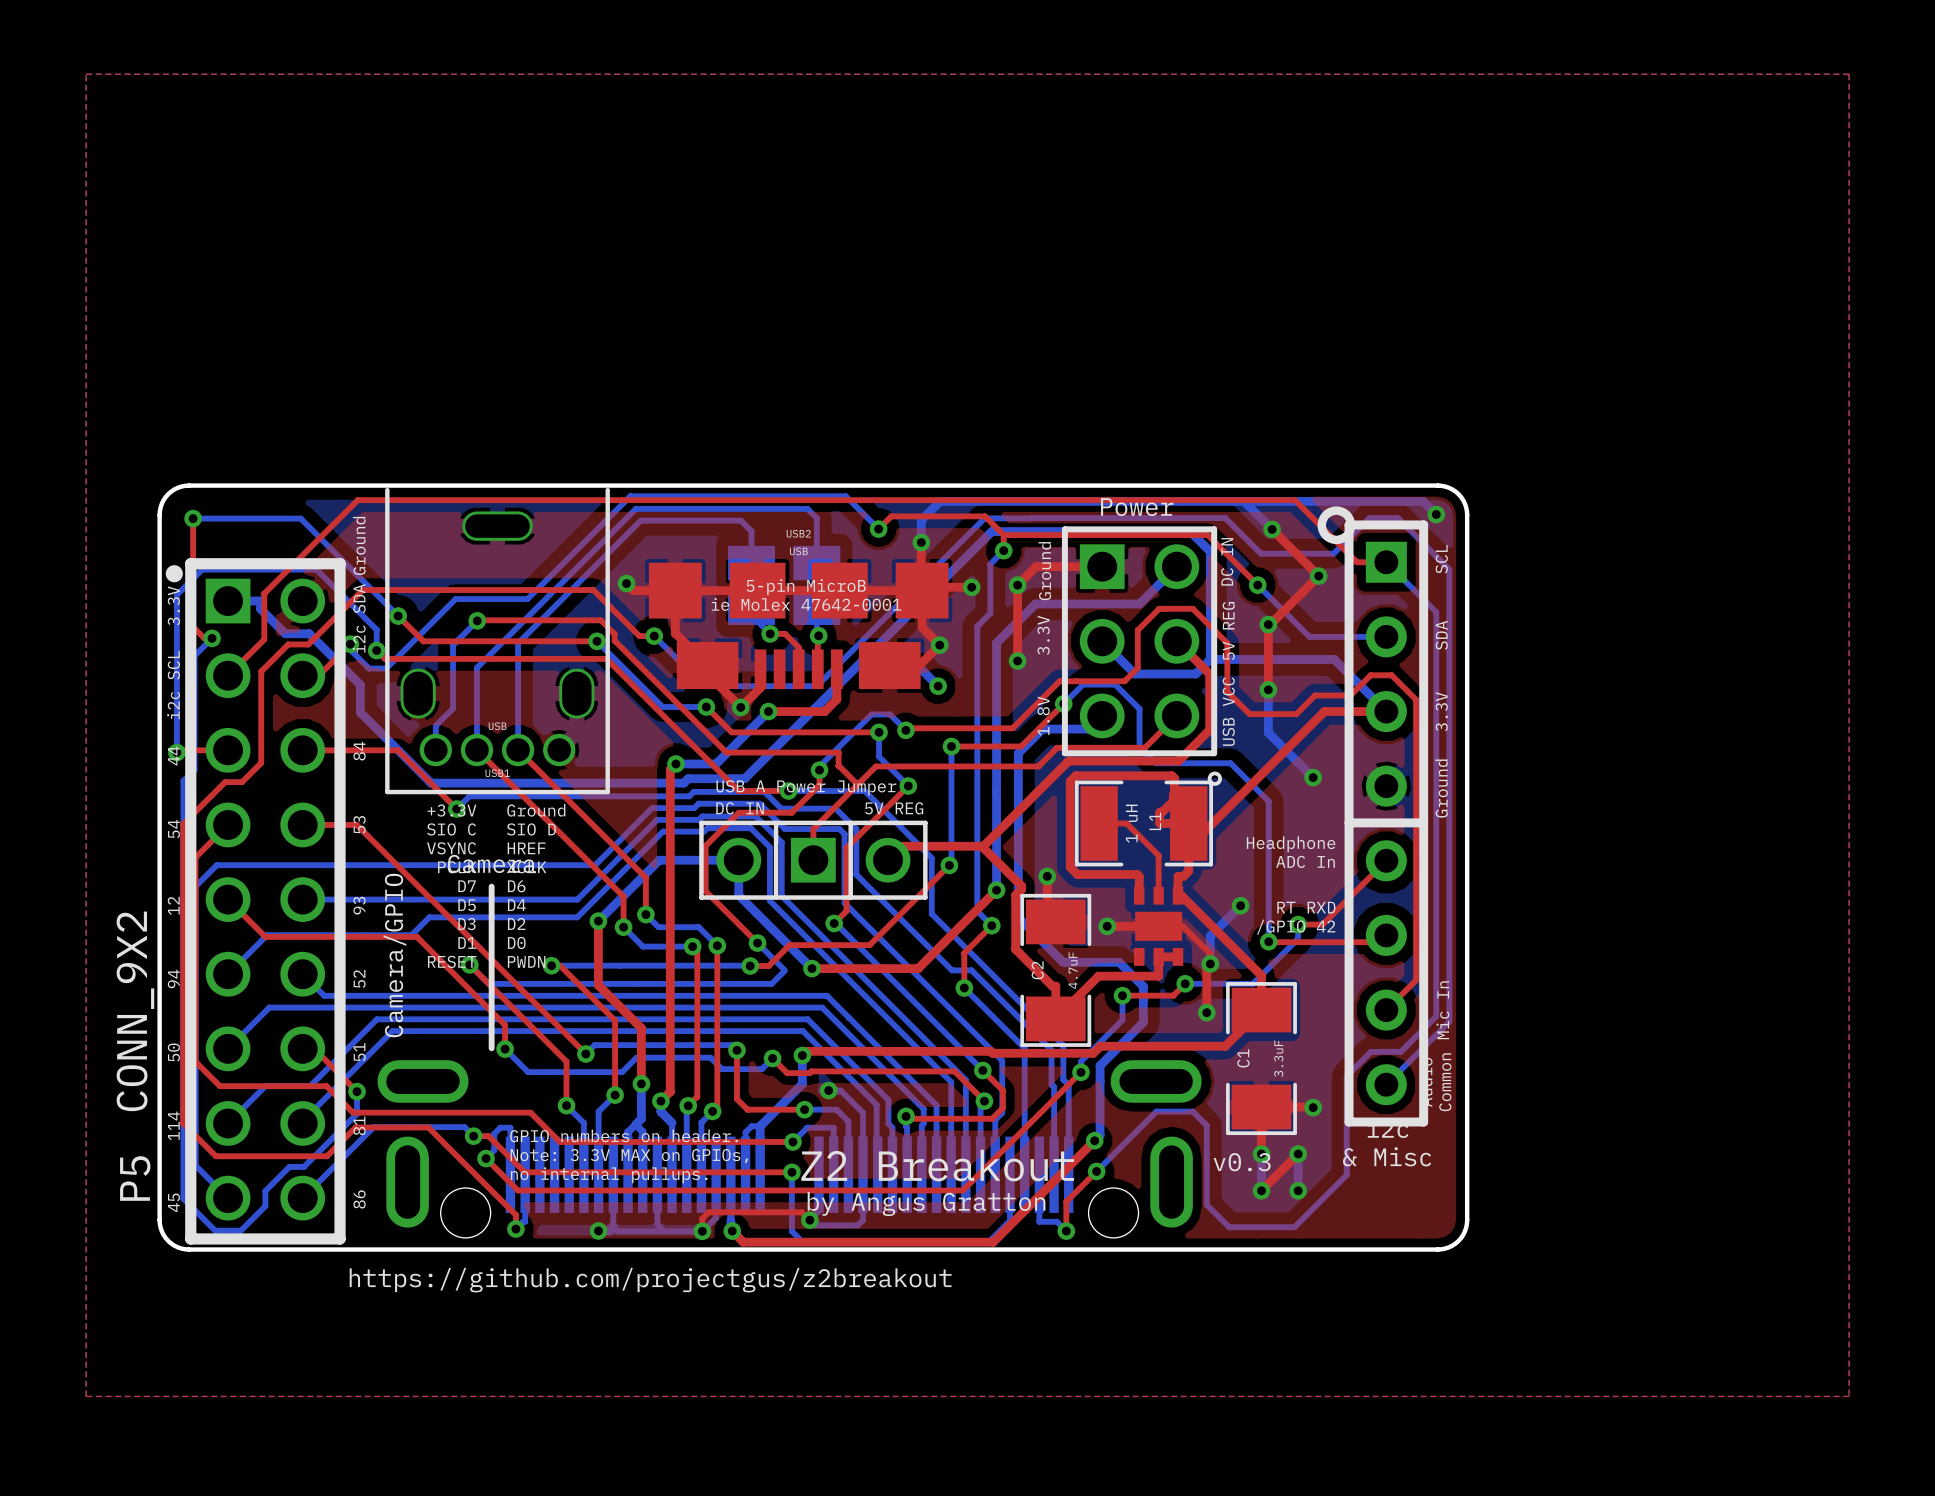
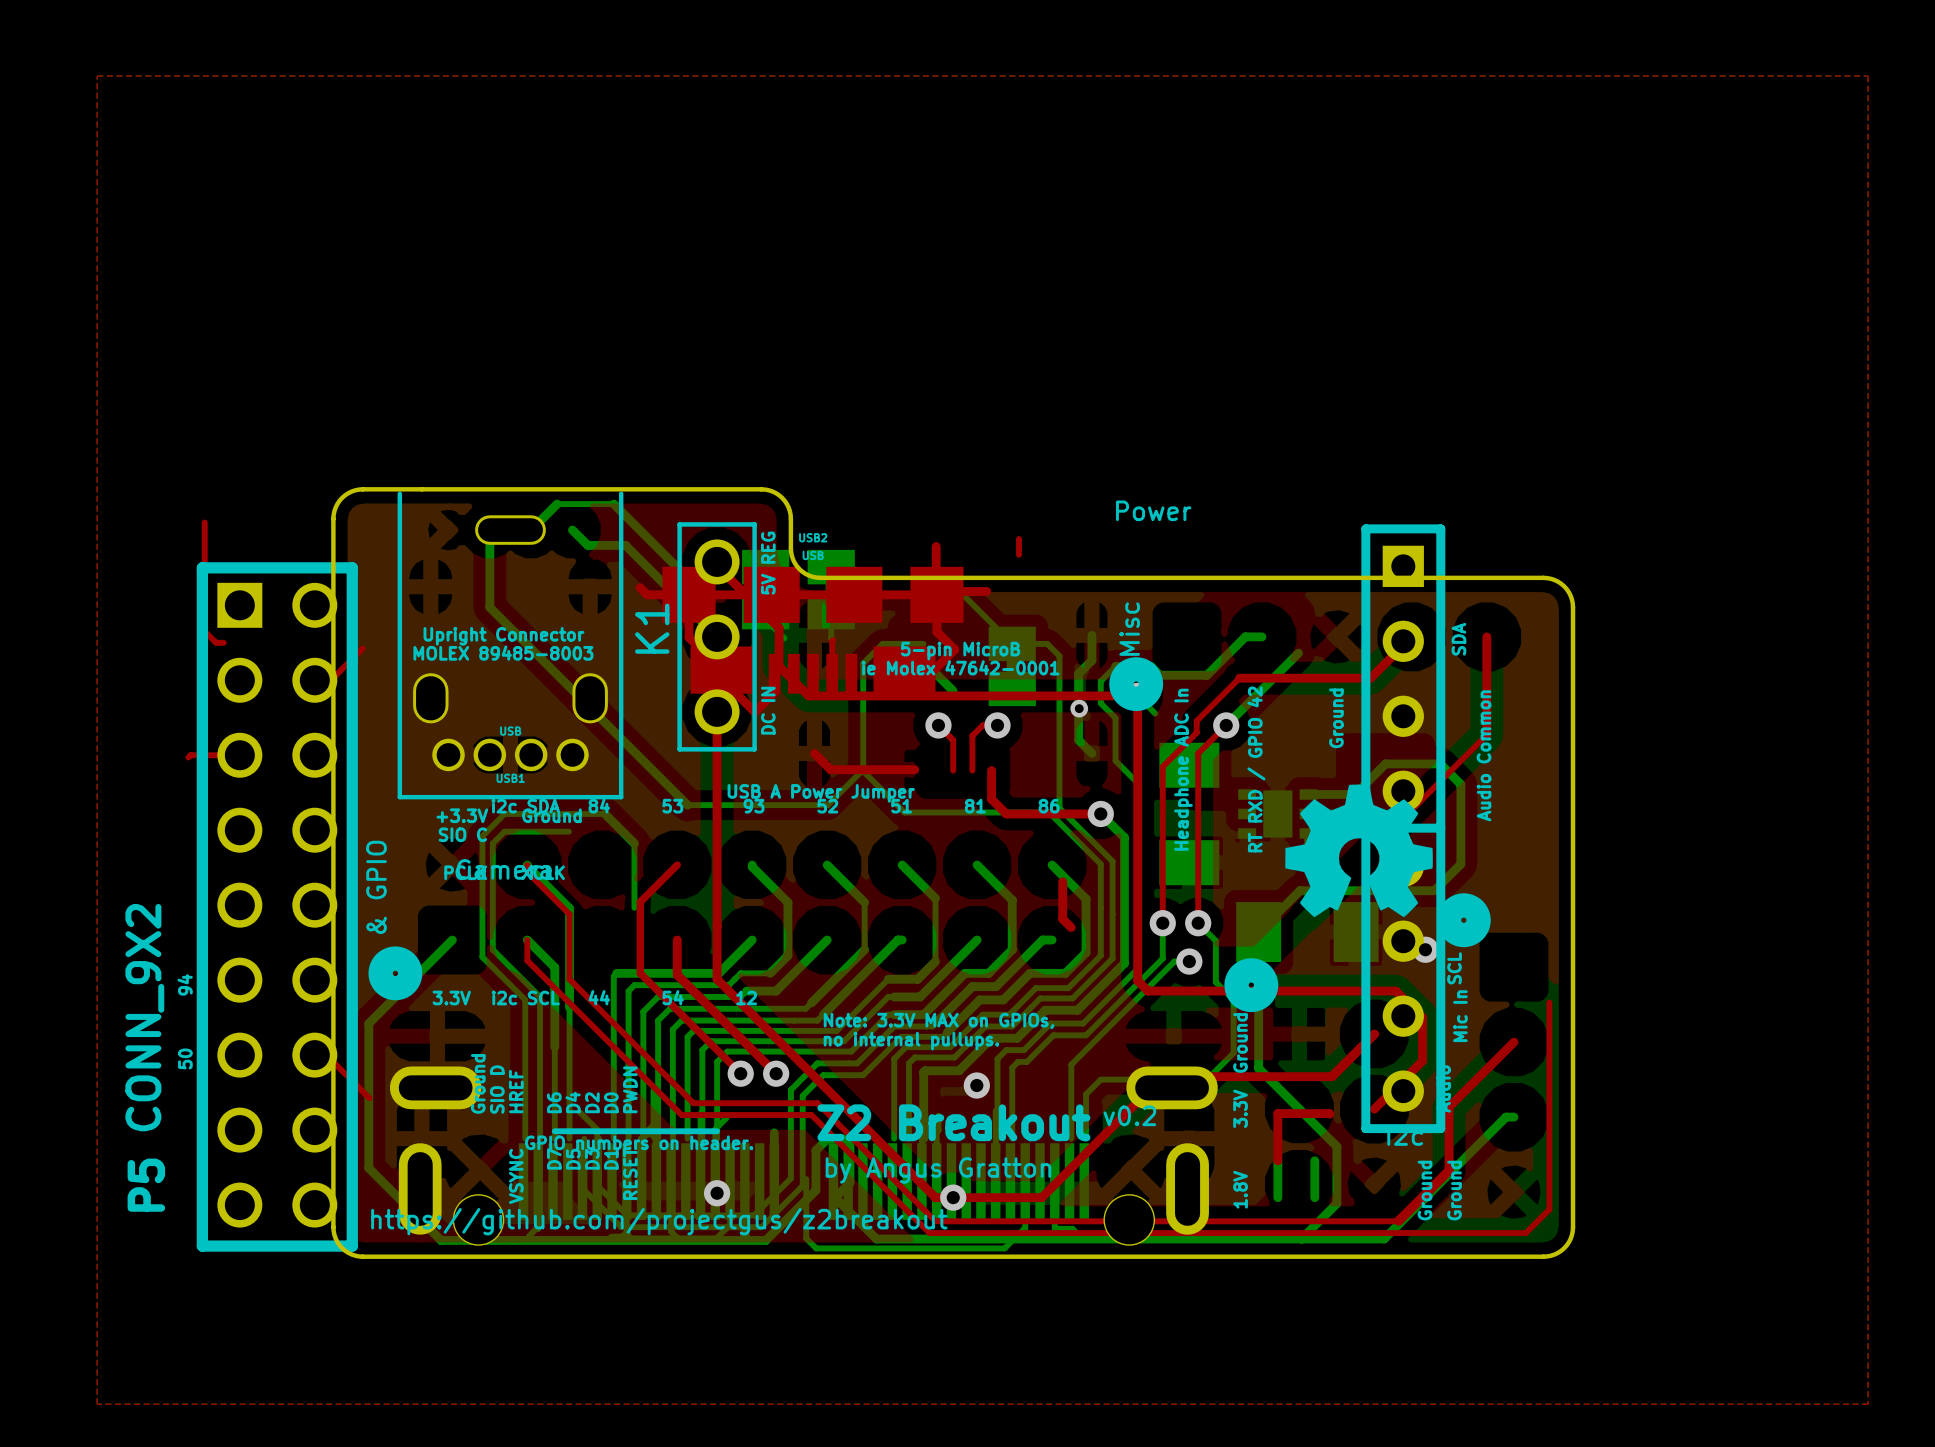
board edge: (350, 485) (185, 485) (174, 489) (165, 497) (159, 514) (160, 1227) (171, 1243) (185, 1249) (350, 1249) -> (362, 489) (351, 491) (342, 497) (335, 507) (333, 518) (333, 1227) (335, 1238) (342, 1248) (351, 1254) (362, 1256)
board edge: (747, 485) (1437, 485) (1449, 487) (1458, 494) (1464, 503) (1467, 514) (1467, 1220) (1464, 1231) (1458, 1240) (1449, 1247) (1437, 1249) -> (761, 489) (776, 493) (786, 504) (790, 514) (790, 548) (793, 559) (802, 571) (816, 577) (1543, 577) (1554, 580) (1564, 586) (1570, 596) (1573, 607) (1572, 1231) (1566, 1245) (1561, 1250) (1551, 1255) (1454, 1256)
bottom track: (1244, 501) (1272, 529) -> none
drawing: [1317, 506, 1356, 545] -> none
bottom track: (1436, 514) (1423, 501) (939, 501) (921, 520) (921, 542) -> none
via: (1436, 514) -> none
bottom track: (193, 518) (300, 518) (398, 616) -> none
via: (193, 518) -> none
bottom track: (1031, 518) (1225, 518) (1260, 553) (1333, 553) (1369, 518) (1397, 518) (1449, 569) (1449, 1021) (1386, 1084) -> none
bottom track: (1031, 518) (984, 518) (816, 686) (704, 686) (654, 636) -> none
bottom track: none -> (489, 530) (489, 607) (687, 805) (827, 805) (863, 769)
bottom track: none -> (531, 530) (557, 504) (613, 504) (705, 595) (963, 595) (1012, 643) (1047, 643) (1059, 656) (1059, 808) (1112, 861) (1112, 958) (1072, 998) (1040, 998) (1012, 1026) (985, 1026) (954, 1057) (914, 1057) (908, 1063) (908, 1138)
bottom track: none -> (572, 530) (587, 545) (625, 545) (717, 636)
bottom track: (878, 529) (845, 496) (630, 496) (527, 599) (455, 599) (386, 668) (368, 668) (350, 649) (350, 644) -> none
top track: (878, 529) (891, 516) (985, 516) (1003, 535) (1207, 535) (1257, 585) -> none
via: (878, 529) -> none
top track: (1272, 529) (1318, 576) (1268, 624) (1268, 689) -> none
via: (1272, 529) -> none
via: (921, 542) -> none
text: Ground (359, 545) -> none
bottom track: (1003, 550) (990, 564) (990, 613) (977, 626) (977, 911) (991, 925) -> none
via: (1003, 550) -> none
top track: none -> (717, 561) (717, 566) (779, 628) (779, 666) (808, 695) (1137, 695) (1137, 980) (1148, 991) (1395, 991) (1422, 1017) (1422, 1061) (1374, 1109)
text: none -> 5V REG (768, 563)
text position: SCL (1441, 559) -> SCL (1454, 968)
text: DC IN (1227, 561) -> none
bottom track: (1386, 562) (1436, 612) (1436, 1016) (1400, 1051) (1370, 1051) (1346, 1076) (1346, 1175) (1294, 1227) (1229, 1227) (1206, 1204) (1206, 1125) (1192, 1111) (1156, 1111) (1096, 1171) -> none
top track: (1386, 562) (1357, 562) (1294, 500) (357, 500) (264, 593) (264, 639) (228, 675) -> none
bottom track: (751, 563) (751, 531) (740, 520) (640, 520) (518, 643) (518, 750) -> none
bottom track: (816, 563) (816, 518) (807, 508) (635, 508) (476, 667) (476, 750) -> none
drawing: [165, 565, 183, 583] -> none
top track: (1102, 566) (1036, 566) (1017, 585) (1017, 660) -> none
bottom track: (1176, 566) (1139, 603) (1035, 603) (996, 642) (996, 890) -> none
text: Ground (1044, 571) -> none
via: (1318, 576) -> none
via: (626, 583) -> none
via: (1017, 585) -> none
bottom track: (1257, 585) (1309, 636) (1386, 636) -> none
via: (1257, 585) -> none
text position: 5-pin MicroB (806, 587) -> 5-pin MicroB (960, 651)
via: (971, 587) -> none
bottom track: (228, 601) (260, 601) (260, 609) (285, 633) (309, 633) (360, 684) (360, 712) (431, 783) (683, 783) (688, 778) (744, 778) (991, 531) (1190, 531) (1210, 551) (1210, 659) -> none
text position: ie Molex 47642-0001 (806, 604) -> ie Molex 47642-0001 (960, 667)
text: 3.3V (173, 605) -> none
top track: (398, 616) (423, 641) (596, 641) -> none
via: (398, 616) -> none
text rotation: 0° (359, 618) -> 90° clockwise (525, 806)
text position: i2c SDA (359, 618) -> i2c SDA (525, 806)
bottom track: (477, 620) (453, 645) (453, 708) (435, 725) (435, 750) -> none
top track: (477, 620) (600, 620) (614, 634) (614, 640) (726, 752) (838, 752) (838, 766) -> none
via: (477, 620) -> none
via: (1268, 624) -> none
text: none -> Misc (1129, 629)
text: none -> Upright Connector (503, 636)
bottom track: none -> (1091, 635) (1091, 660) (1078, 673) (1078, 740) (1091, 753)
text: 5V REG (1228, 631) -> none
K1: none -> (717, 636)
bottom track: none -> (1261, 636) (1245, 636) (1207, 675) (1159, 675) (1150, 666) (1115, 666) (1100, 681) (1100, 703) (1115, 718) (1115, 760) (1139, 784) (1139, 967) (1083, 1023) (1050, 1023) (1024, 1050) (1006, 1050) (997, 1058) (997, 1138)
top track: none -> (1411, 636) (1370, 678) (1239, 678) (1196, 721) (1196, 732) (1162, 766) (1162, 923)
top track: none -> (1486, 636) (1486, 734) (1407, 813)
top track: (770, 633) (785, 633) (798, 647) (798, 669) -> none
via: (770, 633) -> none
via: (818, 635) -> none
text: 3.3V (1043, 635) -> none
top track: (654, 636) (639, 636) (593, 590) (362, 590) (308, 644) (288, 644) (261, 671) (261, 762) (242, 782) (225, 782) (183, 824) (183, 1123) (215, 1156) (326, 1156) (355, 1127) (428, 1127) (515, 1214) (515, 1229) -> none
via: (654, 636) -> none
bottom track: (212, 638) (194, 655) (194, 769) (183, 780) (183, 1198) (215, 1230) (240, 1230) (265, 1206) (265, 1190) (289, 1166) (303, 1166) (357, 1113) (357, 1091) -> none
via: (212, 638) -> none
bottom track: none -> (923, 643) (882, 643) (863, 663) (863, 771) (904, 812) (1049, 812) (1100, 864) (1100, 955) (1068, 988) (1035, 988) (1009, 1014) (982, 1014) (950, 1047) (905, 1047) (894, 1058) (894, 1138)
bottom track: (596, 641) (662, 707) (706, 707) -> none
via: (596, 641) -> none
bottom track: (1102, 641) (1134, 673) (1195, 673) (1210, 659) -> none
part: (1139, 641) -> none
top track: (1176, 641) (1209, 674) (1209, 730) (1178, 761) (1068, 761) (982, 847) -> none
via: (350, 644) -> none
via: (939, 645) -> none
text: none -> MOLEX 89485-8003 (503, 653)
bottom track: none -> (1298, 653) (1226, 725) (1298, 653)
bottom track: (376, 650) (376, 629) (316, 569) (202, 569) (176, 594) (176, 752) -> none
top track: (376, 650) (385, 658) (606, 658) (738, 790) (788, 790) -> none
via: (376, 650) -> none
drawing: none -> [1109, 657, 1164, 712]
bottom track: (1210, 659) (1334, 659) (1386, 711) -> none
via: (1017, 660) -> none
part: none -> (1012, 666)
top track: (836, 669) (836, 699) (824, 711) (768, 711) -> none
bottom track: (1115, 684) (1083, 684) (1063, 703) -> none
text rotation: 0° (173, 685) -> 90° clockwise (525, 998)
text position: i2c SCL (173, 685) -> i2c SCL (525, 998)
via: (938, 686) -> none
bottom track: (1268, 689) (1268, 732) (1313, 777) -> none
via: (1268, 689) -> none
top track: (1063, 703) (1021, 746) (951, 746) -> none
top track: none -> (717, 711) (717, 979) (935, 1197) (1041, 1197) (1162, 1076) (1331, 1076) (1374, 1034)
top track: (706, 707) (731, 732) (879, 732) -> none
via: (706, 707) -> none
via: (740, 707) -> none
bottom track: (1139, 708) (1139, 746) (1156, 763) (1230, 763) (1268, 801) (1268, 941) -> none
bottom track: (768, 711) (716, 763) (675, 763) -> none
via: (768, 711) -> none
text: USB VCC (1228, 711) -> none
top track: (1386, 711) (1324, 711) (1188, 847) -> none
text: 3.3V (1441, 711) -> none
bottom track: (1102, 715) (1089, 729) (1042, 729) (1018, 753) (1018, 917) (1063, 962) (1119, 962) (1143, 986) (1143, 1022) (1100, 1065) (1100, 1135) (1094, 1140) -> none
top track: (1176, 715) (1144, 747) (1057, 747) (1038, 766) (875, 766) (813, 829) (813, 860) -> none
text position: 1.8V (1043, 716) -> 1.8V (1240, 1189)
top track: none -> (938, 725) (953, 740) (953, 770)
top track: none -> (997, 725) (982, 725) (972, 735) (972, 770)
via: none -> (997, 725)
top track: none -> (1226, 725) (1198, 753) (1198, 923)
via: none -> (1226, 725)
bottom track: (905, 730) (890, 714) (871, 714) (819, 766) (819, 770) -> none
top track: (905, 730) (908, 728) (1012, 728) (1059, 681) (1124, 681) (1137, 668) (1137, 630) (1159, 608) (1192, 608) (1227, 643) (1227, 691) (1249, 714) (1296, 714) (1315, 695) (1350, 695) (1370, 675) (1391, 675) (1416, 699) (1416, 980) (1386, 1010) -> none
via position: (905, 730) -> (938, 725)
bottom track: (879, 732) (879, 756) (908, 786) -> none
via: (879, 732) -> none
bottom track: (951, 746) (951, 863) (949, 865) -> none
via: (951, 746) -> none
top track: none -> (814, 753) (830, 769) (914, 769)
top track: (302, 750) (398, 750) (456, 809) -> none
top track: (476, 750) (623, 896) (623, 927) -> none
top track: (518, 750) (645, 877) (645, 914) -> none
text: none -> Audio Common (1484, 755)
text rotation: 0° (359, 751) -> 90° clockwise (599, 805)
text position: 84 (359, 751) -> 84 (599, 805)
via: (176, 752) -> none
text rotation: 0° (173, 755) -> 90° clockwise (599, 997)
text position: 44 (173, 755) -> 44 (599, 997)
top track: (675, 763) (670, 769) (670, 1091) (660, 1101) -> none
via: (675, 763) -> none
text: none -> Headphone ADC In (1183, 769)
text: none -> RT RXD / GPIO 42 (1256, 769)
top track: (838, 765) (857, 784) -> none
top track: none -> (991, 770) (991, 799) (1006, 813) (1100, 813)
top track: (819, 770) (819, 784) (791, 812) (738, 812) (705, 845) (705, 891) (757, 943) -> none
via: (819, 770) -> none
via: (1313, 777) -> none
drawing: none -> [1285, 784, 1491, 948]
top track: (908, 786) (846, 847) (846, 911) (834, 923) -> none
via: (908, 786) -> none
text position: Ground (1441, 788) -> Ground (1336, 718)
bottom track: none -> (1308, 794) (1354, 794) (1385, 763) (1440, 763) (1460, 784) (1460, 864) (1434, 890) (1299, 890) (1258, 932) (1258, 1068) (1336, 1146) (1336, 1203) (1301, 1238)
bottom track: (788, 790) (864, 790) (931, 858) (931, 913) (1063, 1045) (1063, 1079) (1068, 1085) (1068, 1174) -> none
via: (788, 790) -> none
text: none -> 86 (1049, 806)
text rotation: 0° (740, 808) -> 90° counterclockwise (768, 710)
text position: DC IN (740, 808) -> DC IN (768, 710)
text: 5V REG (894, 808) -> none
bottom track: none -> (1100, 813) (1124, 837) (1124, 963) (1077, 1010) (1045, 1010) (1017, 1038) (991, 1038) (959, 1070) (925, 1070) (923, 1138)
via: none -> (1100, 813)
bottom track: (456, 809) (469, 796) (689, 796) (693, 791) (764, 791) (781, 808) (835, 808) (856, 829) (856, 874) (952, 970) (971, 970) (1051, 1050) (1051, 1084) (1054, 1087) (1054, 1174) -> none
via: (456, 809) -> none
L1: 1 uH (1148, 818) -> none
top track: (1099, 823) (1126, 823) (1158, 855) (1158, 895) -> none
top track: (228, 824) (195, 857) (195, 1061) (219, 1086) (326, 1086) (353, 1112) (530, 1112) (559, 1141) (792, 1141) -> none
top track: (302, 824) (356, 824) (585, 1053) -> none
text rotation: 0° (359, 824) -> 90° clockwise (672, 806)
text position: 53 (359, 824) -> 53 (672, 806)
bottom track: none -> (568, 831) (504, 831) (492, 843) (492, 949) (540, 997) (540, 1138)
text rotation: 0° (173, 829) -> 90° clockwise (673, 997)
text position: 54 (173, 829) -> 54 (673, 997)
text rotation: 0° (531, 829) -> 90° counterclockwise (497, 1089)
text position: SIO D (531, 829) -> SIO D (497, 1089)
text: Headphone (1291, 844) -> none
text rotation: 0° (451, 848) -> 90° counterclockwise (516, 1176)
text position: VSYNC (451, 848) -> VSYNC (516, 1176)
text rotation: 0° (526, 848) -> 90° counterclockwise (516, 1091)
text position: HREF (526, 848) -> HREF (516, 1091)
bottom track: none -> (527, 865) (569, 908) (569, 1138)
top track: none -> (527, 865) (527, 872) (569, 914) (569, 979) (693, 1103) (817, 1103) (935, 1221) (1395, 1221) (1449, 1168)
bottom track: none -> (752, 865) (787, 902) (787, 955) (770, 973) (740, 973) (728, 985) (634, 985) (628, 991) (628, 1138)
bottom track: none -> (1052, 865) (1086, 898) (1086, 952) (1065, 973) (1029, 973) (1003, 999) (979, 999) (942, 1036) (901, 1036) (863, 1075) (823, 1075) (802, 1095) (802, 1185) (761, 1227) (621, 1227) (584, 1190) (584, 1138)
part: (813, 860) -> none
top track: (888, 860) (901, 846) (981, 846) (1021, 886) (1021, 889) (1015, 895) (1015, 949) (1052, 986) (1055, 986) (1055, 1018) (1098, 976) (1158, 976) (1158, 956) (1178, 956) -> none
top track: (1386, 860) (1322, 924) (1298, 924) -> none
text: ADC In (1305, 861) -> none
top track: (949, 865) (869, 945) (789, 945) (768, 965) (750, 965) -> none
via: (949, 865) -> none
via: (1047, 876) -> none
text: none -> & GPIO (376, 887)
text rotation: 0° (467, 886) -> 90° counterclockwise (554, 1158)
text position: D7 (467, 886) -> D7 (554, 1158)
line: (491, 886) (491, 1048) -> none
text rotation: 0° (516, 886) -> 90° counterclockwise (554, 1102)
text position: D6 (516, 886) -> D6 (554, 1102)
top track: (996, 890) (918, 968) (811, 968) -> none
via: (996, 890) -> none
bottom track: none -> (935, 898) (902, 865) (935, 898)
bottom track: none -> (935, 898) (935, 961) (917, 979) (888, 979) (836, 1030) (693, 1030) (687, 1036) (687, 1138)
bottom track: none -> (1012, 900) (1012, 949) (988, 973) (965, 973) (923, 1014) (888, 1014) (851, 1051) (727, 1051) (717, 1061) (717, 1138)
bottom track: none -> (1012, 900) (977, 865) (1012, 900)
top track: (1139, 895) (1139, 876) (1137, 874) (1077, 874) (1070, 867) (1070, 781) (1075, 775) (1171, 775) (1174, 778) (1173, 800) (1159, 812) (1159, 823) (1188, 823) (1188, 871) (1183, 876) (1178, 876) (1178, 895) (1181, 895) (1261, 975) (1261, 1010) (1225, 1046) (1100, 1046) (1093, 1053) (806, 1051) (802, 1055) -> none
top track: none -> (640, 901) (640, 973) (740, 1073)
top track: none -> (640, 901) (677, 865) (640, 901)
bottom track: none -> (864, 902) (827, 865) (864, 902)
bottom track: none -> (864, 902) (864, 949) (805, 1008) (669, 1008) (658, 1020) (658, 1138)
top track: (228, 899) (265, 936) (416, 936) (505, 1025) (505, 1049) -> none
bottom track: (302, 899) (577, 899) (657, 819) (699, 819) (702, 816) (755, 816) (781, 842) (781, 895) (965, 1080) (965, 1174) -> none
bottom track: none -> (634, 907) (634, 843) (604, 813) (504, 813) (482, 836) (482, 957) (525, 999) (525, 1138)
text rotation: 0° (173, 905) -> 90° clockwise (746, 998)
text position: 12 (173, 905) -> 12 (746, 998)
text rotation: 0° (359, 905) -> 90° clockwise (753, 806)
text position: 93 (359, 905) -> 93 (753, 806)
text rotation: 0° (467, 905) -> 90° counterclockwise (573, 1159)
text position: D5 (467, 905) -> D5 (573, 1159)
text rotation: 0° (516, 905) -> 90° counterclockwise (573, 1102)
text position: D4 (516, 905) -> D4 (573, 1102)
bottom track: (1240, 905) (1210, 936) (1210, 963) -> none
via: (1240, 905) -> none
text: RT RXD (1306, 907) -> none
bottom track: (645, 914) (658, 927) (698, 927) (717, 945) -> none
via: (645, 914) -> none
bottom track: none -> (1162, 923) (1162, 958) (1086, 1035) (1053, 1035) (1026, 1061) (1018, 1061) (1012, 1067) (1012, 1138)
via: none -> (1162, 923)
bottom track: none -> (1198, 923) (1215, 940) (1215, 982) (1233, 999) (1233, 1053) (1207, 1079) (1100, 1079) (1086, 1094) (1086, 1138)
via: none -> (1198, 923)
bottom track: (598, 921) (659, 860) (738, 860) (738, 895) (811, 968) -> none
top track: (598, 921) (598, 985) (641, 1028) (641, 1083) -> none
via: (598, 921) -> none
text rotation: 0° (516, 923) -> 90° counterclockwise (592, 1102)
text position: D2 (516, 923) -> D2 (592, 1102)
bottom track: (834, 923) (982, 1070) -> none
via: (834, 923) -> none
text rotation: 0° (466, 924) -> 90° counterclockwise (592, 1159)
text position: D3 (466, 924) -> D3 (592, 1159)
bottom track: (1298, 924) (1298, 938) (1252, 983) (1185, 983) -> none
via: (1298, 924) -> none
top track: (991, 925) (964, 953) (964, 988) -> none
via: (991, 925) -> none
top track: (1107, 926) (1182, 926) (1210, 953) (1210, 963) (1206, 967) (1206, 1012) -> none
via: (1107, 926) -> none
part side: top (1158, 926) -> bottom (1277, 813)
bottom track: (623, 927) (642, 946) (692, 946) -> none
via: (623, 927) -> none
text: /GPIO 42 (1296, 927) -> none
bottom track: none -> (452, 940) (368, 1023) (368, 1168) (441, 1240) (765, 1240) (815, 1190) (815, 1150) (827, 1138) (849, 1138) (849, 1182) (835, 1197) (876, 1238) (1384, 1238) (1506, 1117) (1513, 1117)
bottom track: none -> (527, 940) (554, 967) (554, 1138)
top track: none -> (527, 940) (527, 960) (681, 1115) (811, 1115) (929, 1233) (1525, 1233) (1549, 1209) (1549, 1002)
top track: none -> (677, 940) (677, 974) (776, 1073)
bottom track: none -> (752, 940) (718, 973) (616, 973) (613, 976) (613, 1138)
bottom track: none -> (827, 940) (776, 991) (746, 991) (740, 996) (658, 996) (643, 1011) (643, 1138)
bottom track: none -> (902, 940) (898, 940) (817, 1020) (681, 1020) (672, 1029) (672, 1138)
bottom track: none -> (977, 940) (920, 996) (888, 996) (844, 1041) (711, 1041) (702, 1050) (702, 1138)
bottom track: none -> (1052, 940) (1042, 940) (996, 986) (972, 986) (932, 1026) (894, 1026) (857, 1063) (817, 1063) (790, 1089) (790, 1178) (753, 1215) (627, 1215) (599, 1187) (599, 1138)
top track: (1386, 935) (1379, 942) (1268, 941) -> none
drawing: none -> [368, 946, 423, 1001]
via: (1268, 941) -> none
text rotation: 0° (467, 942) -> 90° counterclockwise (611, 1159)
text position: D1 (467, 942) -> D1 (611, 1159)
text rotation: 0° (516, 942) -> 90° counterclockwise (611, 1102)
text position: D0 (516, 942) -> D0 (611, 1102)
bottom track: (757, 943) (784, 969) (771, 983) (488, 983) (469, 964) -> none
via: (757, 943) -> none
via: none -> (1425, 949)
top track: (717, 945) (717, 1106) (712, 1111) -> none
via: (717, 945) -> none
top track: (692, 946) (697, 951) (697, 1096) (688, 1105) -> none
via: (692, 946) -> none
drawing: none -> [1224, 958, 1279, 1013]
text: Camera/GPIO (394, 955) -> none
bottom track: none -> (1189, 961) (1174, 961) (1071, 1064) (1071, 1138)
via: none -> (1189, 961)
text rotation: 0° (452, 961) -> 90° counterclockwise (630, 1173)
text position: RESET (452, 961) -> RESET (630, 1173)
text rotation: 0° (526, 961) -> 90° counterclockwise (630, 1089)
text position: PWDN (526, 961) -> PWDN (630, 1089)
via: (1210, 963) -> none
top track: (469, 964) (566, 1061) (566, 1105) -> none
via: (469, 964) -> none
bottom track: (551, 965) (749, 965) -> none
top track: (551, 965) (560, 965) (615, 1020) (615, 1095) -> none
via: (551, 965) -> none
via: (750, 965) -> none
via: (811, 968) -> none
C2 side: top (1055, 970) -> bottom (1189, 813)
bottom track: (228, 974) (267, 935) (411, 935) (429, 917) (577, 917) (662, 831) (703, 831) (707, 828) (750, 828) (769, 847) (769, 900) (951, 1082) (951, 1174) -> none
bottom track: (302, 974) (324, 995) (827, 995) (936, 1105) (936, 1174) -> none
text rotation: 0° (359, 978) -> 90° clockwise (827, 806)
text position: 52 (359, 978) -> 52 (827, 806)
top track: (1185, 983) (1173, 995) (1122, 995) -> none
via: (1185, 983) -> none
bottom track: (964, 988) (1024, 1048) (1024, 1174) -> none
via: (964, 988) -> none
text: none -> 3.3V (451, 998)
bottom track: (1122, 995) (1122, 1020) (1080, 1061) (1080, 1072) -> none
via: (1122, 995) -> none
via: (1206, 1012) -> none
top track: none -> (1513, 1042) (1449, 1107) (1449, 1171) (1398, 1221)
text: none -> Ground (1240, 1043)
bottom track: (692, 1045) (594, 1045) (585, 1053) -> none
bottom track: (692, 1045) (731, 1045) (737, 1050) -> none
bottom track: (228, 1048) (269, 1007) (822, 1007) (923, 1109) -> none
bottom track: (505, 1049) (528, 1072) (622, 1072) (636, 1057) (710, 1057) (721, 1069) (761, 1069) (772, 1058) -> none
via: (505, 1049) -> none
via size: [763, 1049, 782, 1068] -> [763, 1060, 790, 1087]
top track: (737, 1050) (737, 1099) (747, 1109) (804, 1109) -> none
via position: (737, 1050) -> (740, 1073)
text rotation: 0° (359, 1052) -> 90° clockwise (901, 806)
text position: 51 (359, 1052) -> 51 (901, 806)
via: (585, 1053) -> none
bottom track: (802, 1055) (802, 1084) (760, 1126) (751, 1126) (745, 1132) (745, 1174) -> none
via: (802, 1055) -> none
top track: (772, 1058) (787, 1073) (954, 1071) (984, 1101) -> none
C1 side: top (1261, 1058) -> bottom (1307, 932)
top track: (982, 1070) (1002, 1090) (1002, 1107) (992, 1118) (908, 1118) (906, 1116) -> none
via position: (982, 1070) -> (976, 1085)
top track: (1080, 1072) (962, 1190) (517, 1190) (486, 1158) -> none
via: (1080, 1072) -> none
text: none -> Ground (478, 1083)
text: Common (1445, 1082) -> none
via: (641, 1083) -> none
bottom track: (828, 1090) (840, 1090) (863, 1112) (863, 1220) (857, 1225) (815, 1225) (809, 1220) (819, 1211) (819, 1174) -> none
via: (828, 1090) -> none
via: (357, 1091) -> none
bottom track: (615, 1095) (598, 1111) (598, 1174) -> none
via: (615, 1095) -> none
bottom track: (660, 1101) (660, 1111) (672, 1122) (672, 1174) -> none
via: (660, 1101) -> none
via: (984, 1101) -> none
text: none -> 3.3V (1240, 1108)
via: (566, 1105) -> none
via: (688, 1105) -> none
via: (1313, 1107) -> none
bottom track: (804, 1109) (836, 1109) (848, 1121) (848, 1174) -> none
via: (804, 1109) -> none
text: none -> v0.2 (1129, 1115)
via: (712, 1111) -> none
via: (906, 1116) -> none
bottom track: (228, 1123) (265, 1086) (310, 1086) (376, 1019) (807, 1019) (888, 1099) (888, 1123) (892, 1127) (892, 1174) -> none
bottom track: (302, 1123) (302, 1120) (392, 1031) (802, 1031) (876, 1104) (877, 1174) -> none
line: none -> (554, 1131) (717, 1131)
text rotation: 0° (359, 1125) -> 90° clockwise (975, 806)
text position: 81 (359, 1125) -> 81 (975, 806)
text: 114 (173, 1126) -> none
bottom track: (473, 1136) (464, 1127) (373, 1127) (302, 1198) -> none
top track: (473, 1136) (488, 1136) (524, 1172) (791, 1172) -> none
via: (473, 1136) -> none
top track: (1094, 1140) (993, 1242) (743, 1242) (732, 1231) -> none
via: (1094, 1140) -> none
bottom track: (792, 1141) (807, 1127) (833, 1127) (833, 1174) -> none
via: (792, 1141) -> none
via: (1261, 1154) -> none
top track: (1298, 1154) (1261, 1190) -> none
via: (1298, 1154) -> none
text position: Note: 3.3V MAX on GPIOs, (629, 1156) -> Note: 3.3V MAX on GPIOs, (939, 1020)
text: & Misc (1387, 1156) -> none
bottom track: (486, 1158) (494, 1150) (494, 1133) (500, 1127) (510, 1127) (510, 1174) -> none
via: (486, 1158) -> none
text: v0.3 (1242, 1162) -> none
text position: Z2 Breakout (937, 1165) -> Z2 Breakout (953, 1122)
top track: (1096, 1171) (1066, 1201) (1066, 1231) -> none
via: (1096, 1171) -> none
via: (791, 1172) -> none
bottom track: (995, 1174) (995, 1119) (1002, 1112) (1002, 1060) (844, 903) (844, 834) (839, 829) (784, 829) (759, 803) (698, 803) (694, 808) (652, 808) (595, 865) (216, 865) (195, 886) (195, 1165) (228, 1198) -> none
text position: no internal pullups. (609, 1175) -> no internal pullups. (911, 1041)
text: none -> Ground (1425, 1190)
text: none -> Ground (1454, 1190)
via: none -> (717, 1193)
via: none -> (953, 1197)
via: (1261, 1190) -> none
via: (1298, 1190) -> none
text: 86 (359, 1199) -> none
text: 45 (173, 1202) -> none
text position: by Angus Gratton (926, 1204) -> by Angus Gratton (938, 1170)
top track: (809, 1220) (802, 1212) (708, 1212) (702, 1218) (702, 1231) -> none
via: (809, 1220) -> none
via: (515, 1229) -> none
via: (598, 1230) -> none
via: (702, 1231) -> none
via: (732, 1231) -> none
via: (1066, 1231) -> none
text position: https://github.com/projectgus/z2breakout (650, 1280) -> https://github.com/projectgus/z2breakout (659, 1221)

